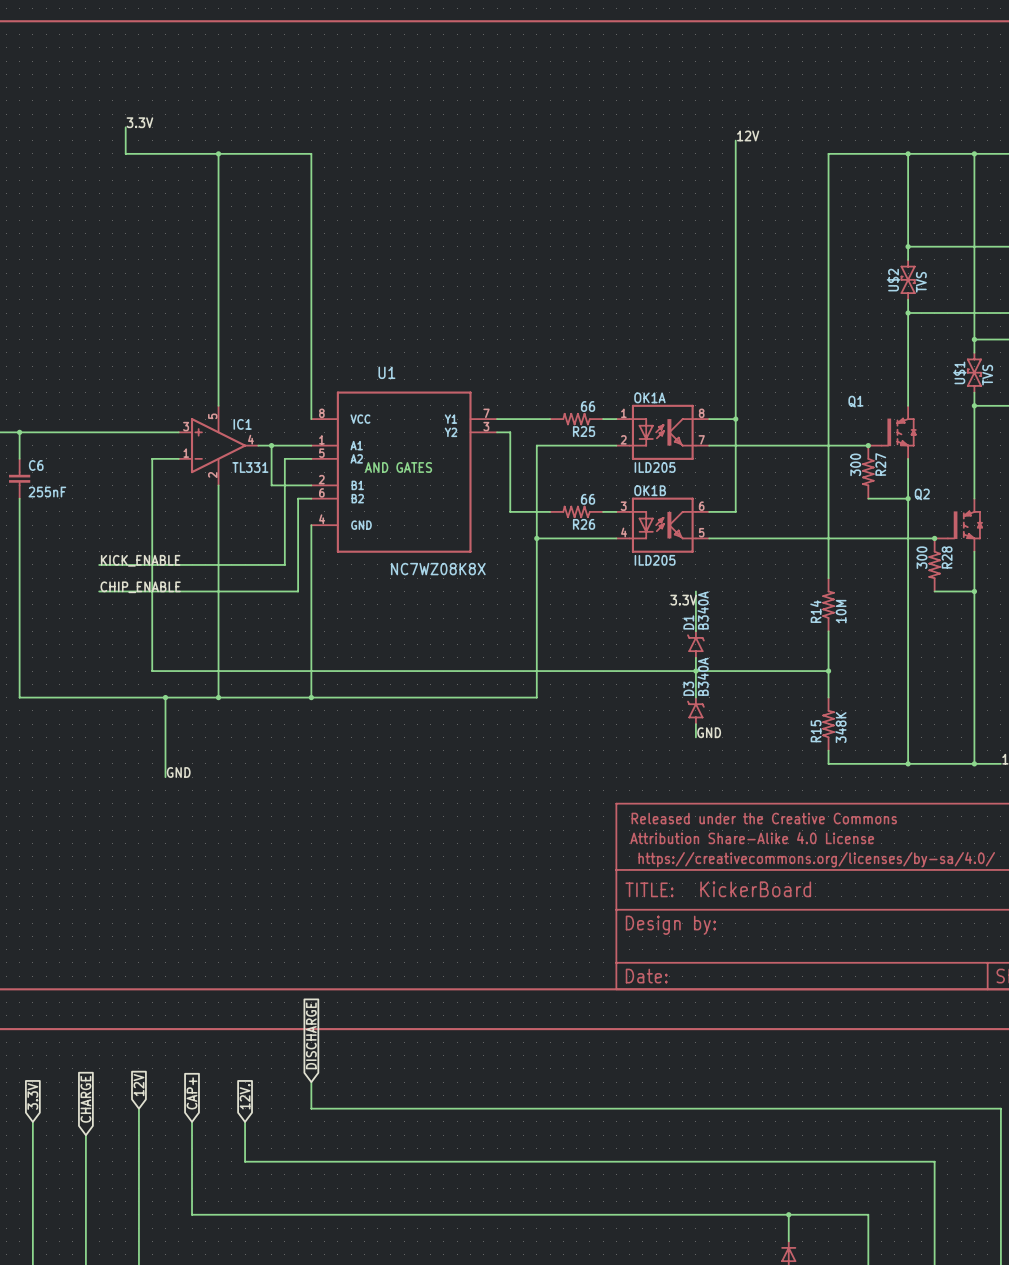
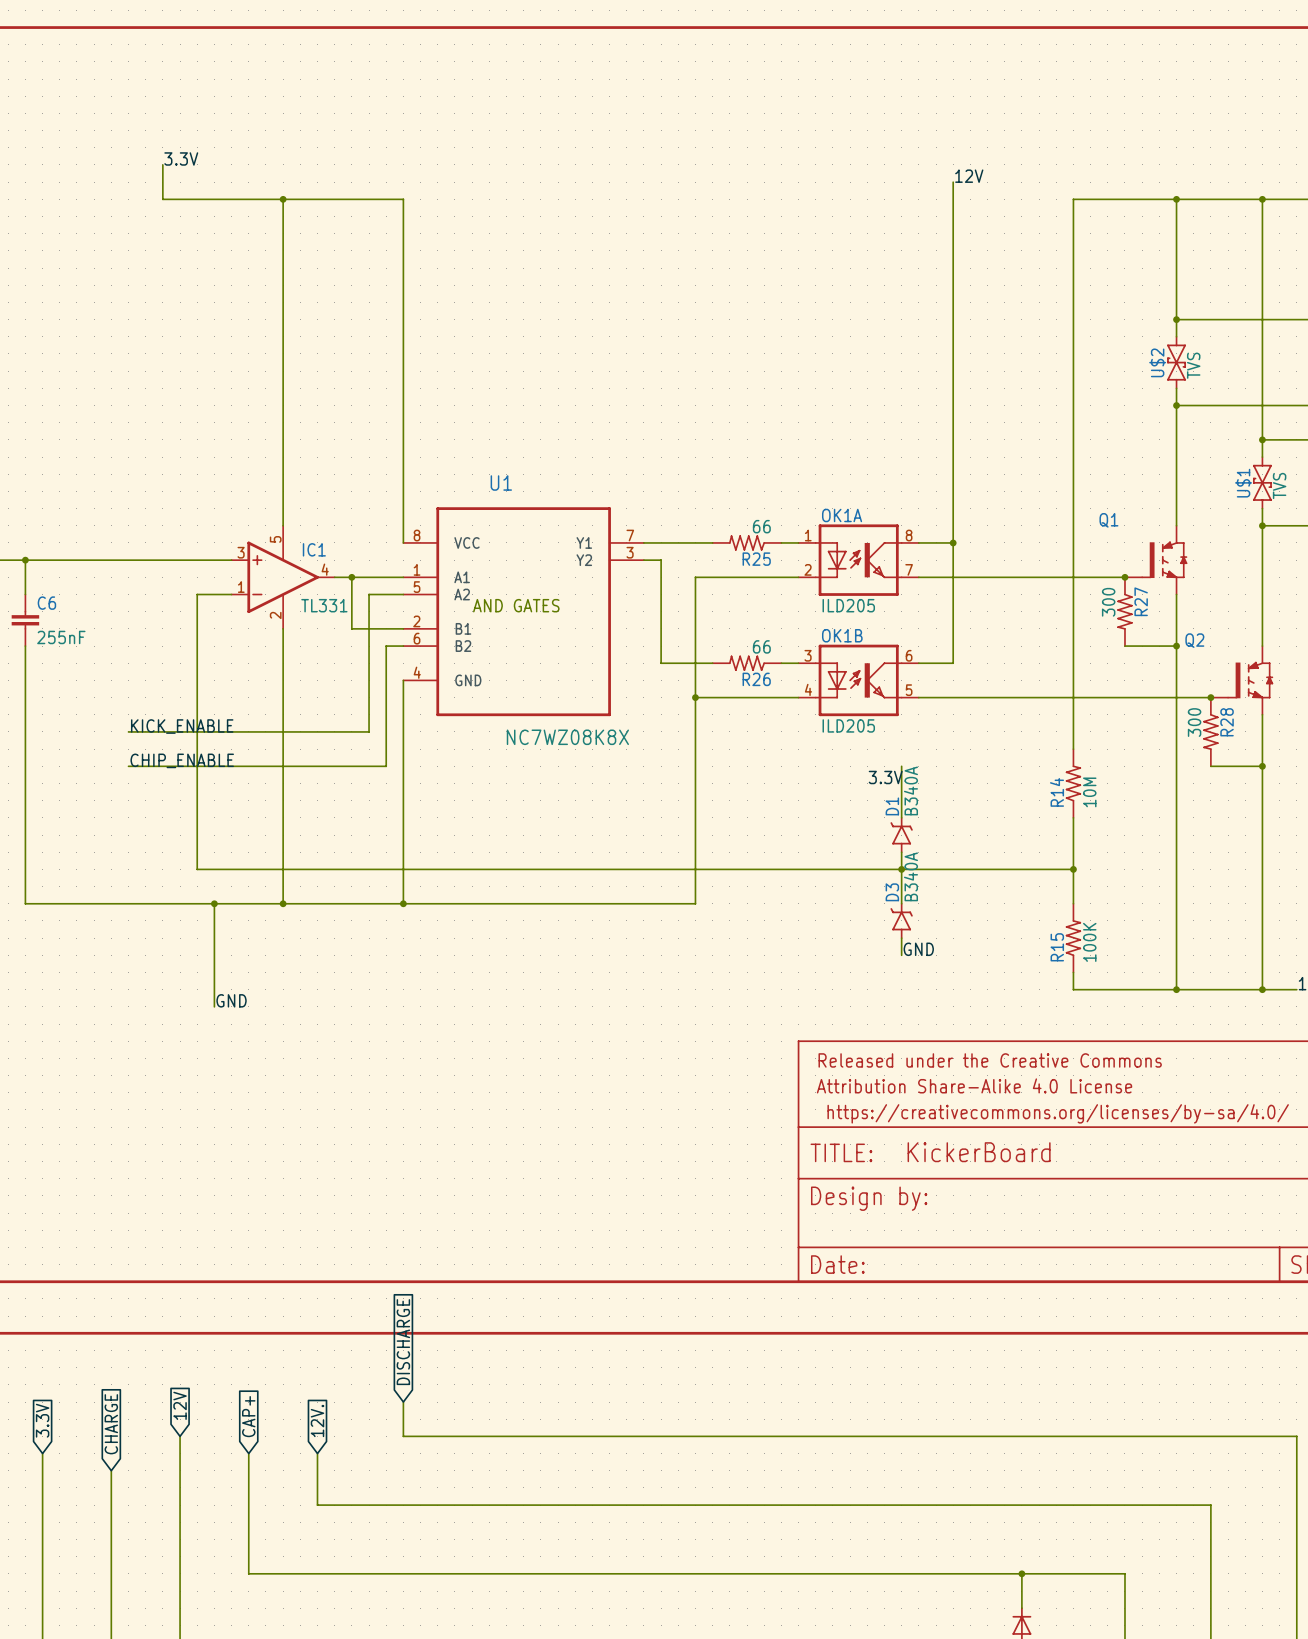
R15 value: 348K (840, 727) -> 100K (1089, 942)

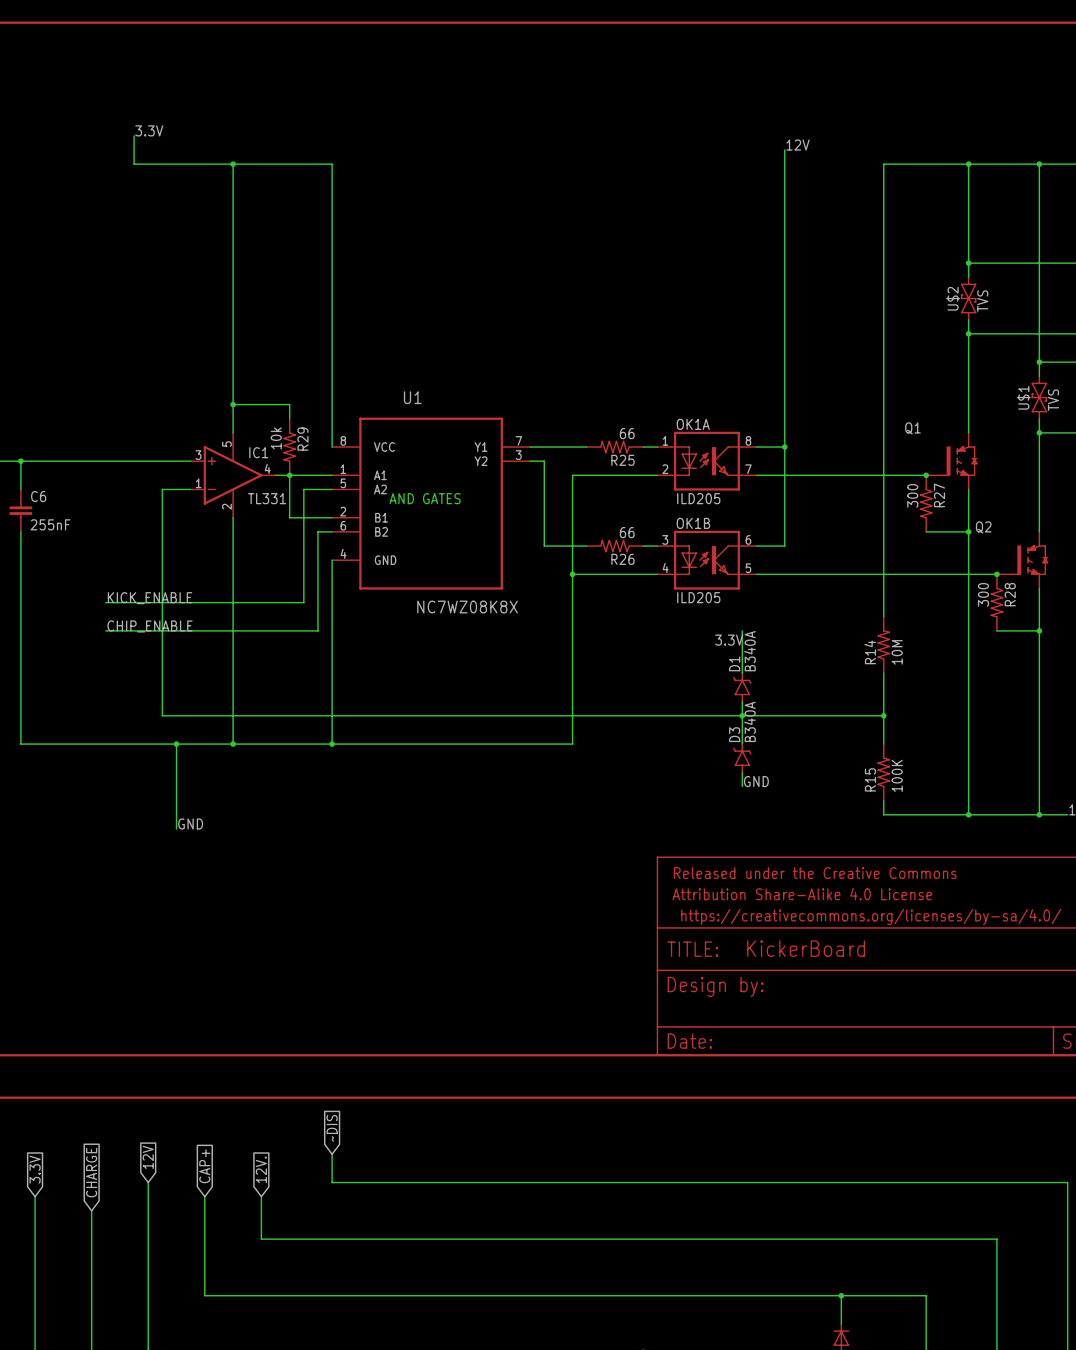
wire: none -> (233, 404) (289, 404) (289, 418)
junction: none -> (233, 404)
R29: none -> 10k (289, 447)
global label: DISCHARGE (403, 1342) -> ~DIS (332, 1128)

